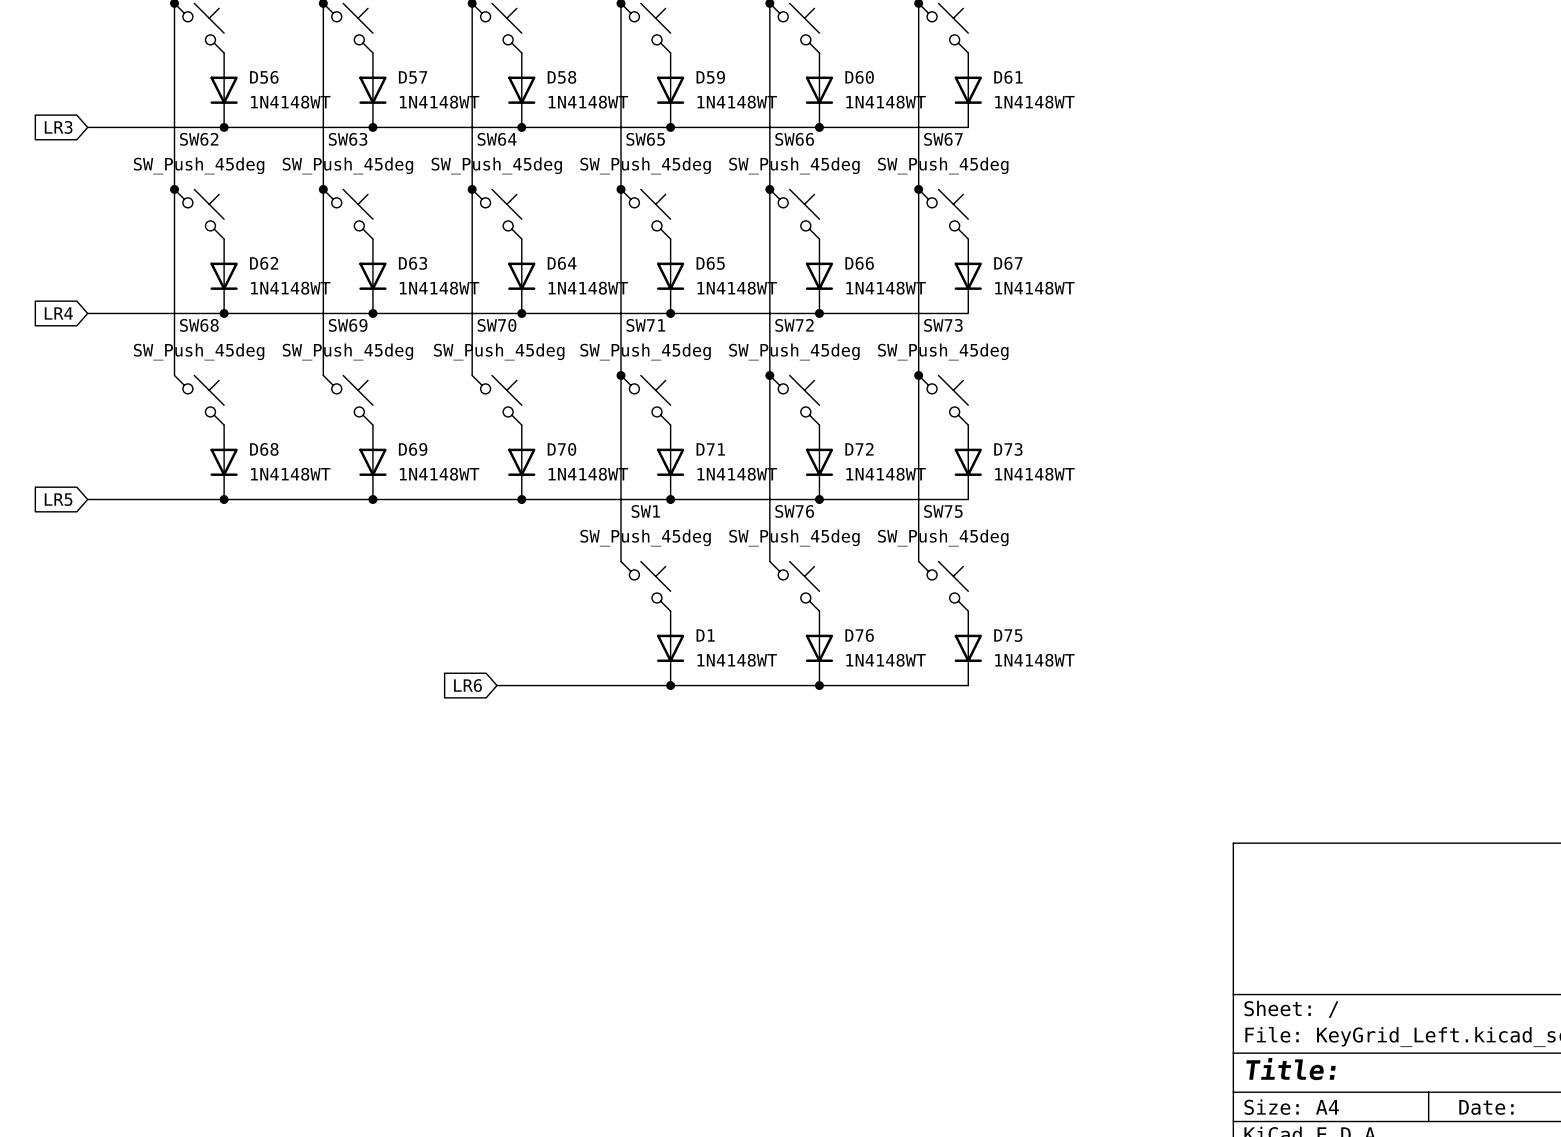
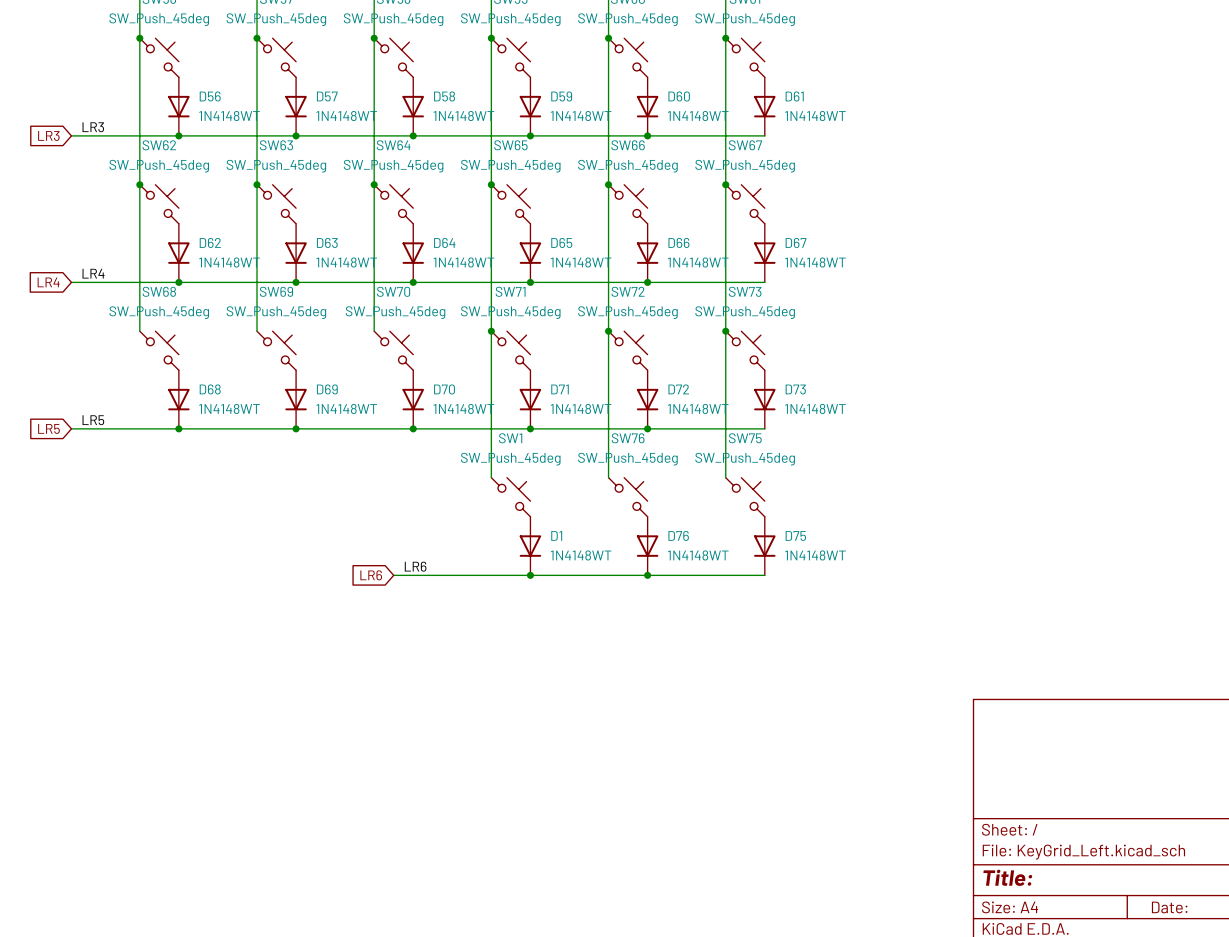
label: none -> LR3 (93, 127)
label: none -> LR4 (93, 273)
label: none -> LR5 (93, 420)
label: none -> LR6 (415, 566)

